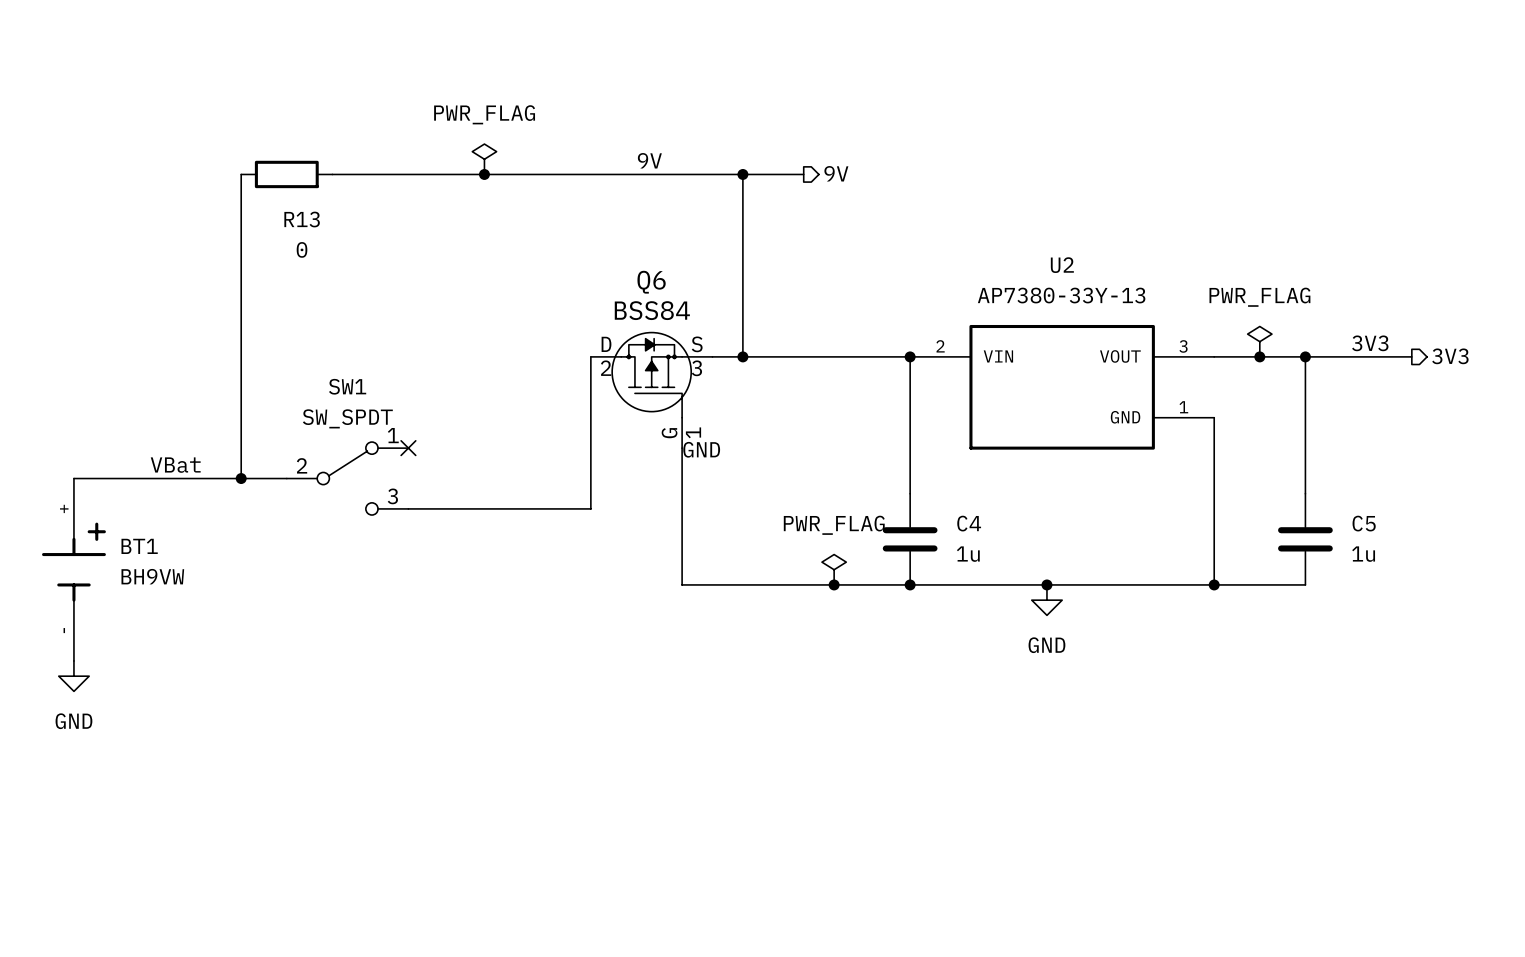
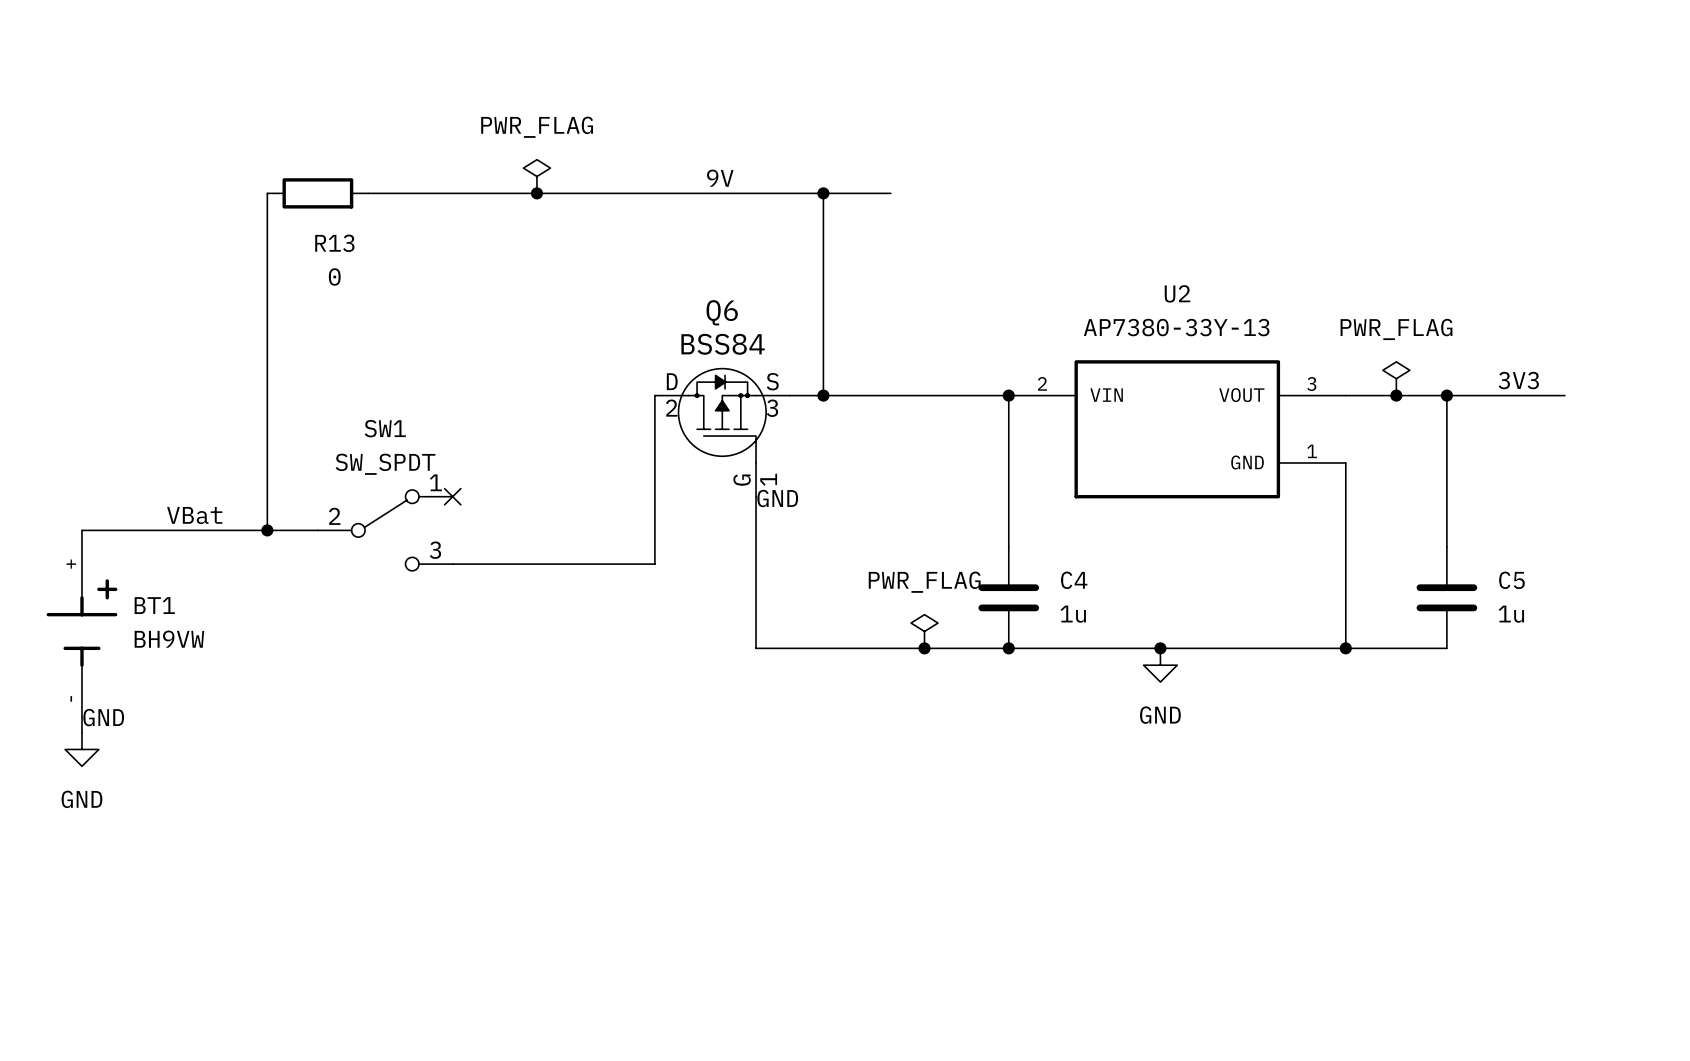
hierarchical label: 9V (836, 173) -> none
hierarchical label: 3V3 (1450, 356) -> none
label: none -> GND (103, 717)

